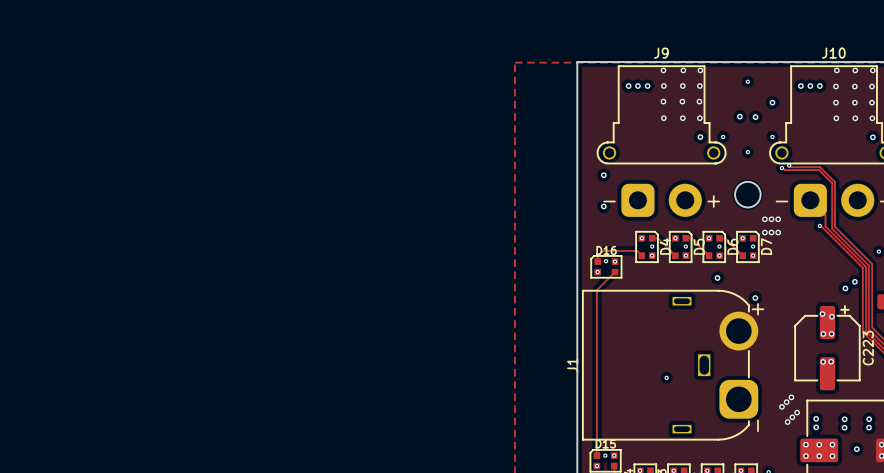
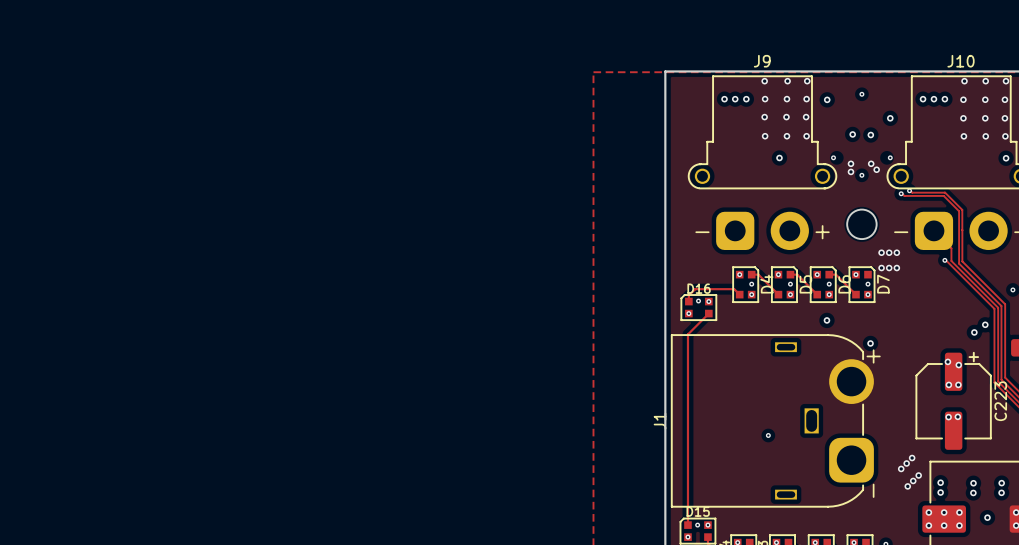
via: none -> (827, 99)
via: none -> (779, 158)
via: (700, 137) -> none
via: none -> (850, 163)
via: none -> (871, 163)
via: none -> (876, 169)
via: none -> (850, 171)
via: (603, 175) -> none
via: (603, 206) -> none

